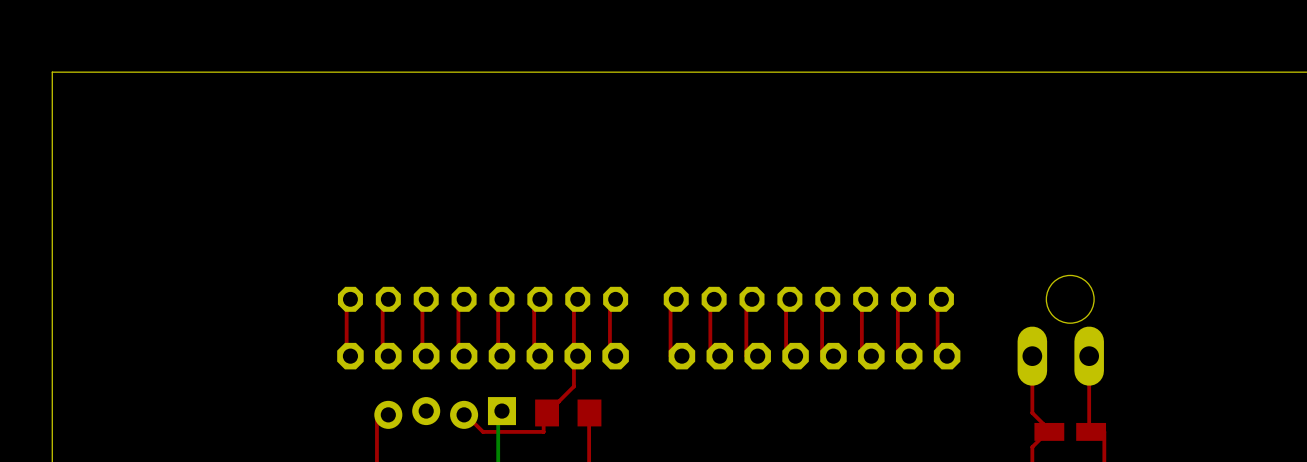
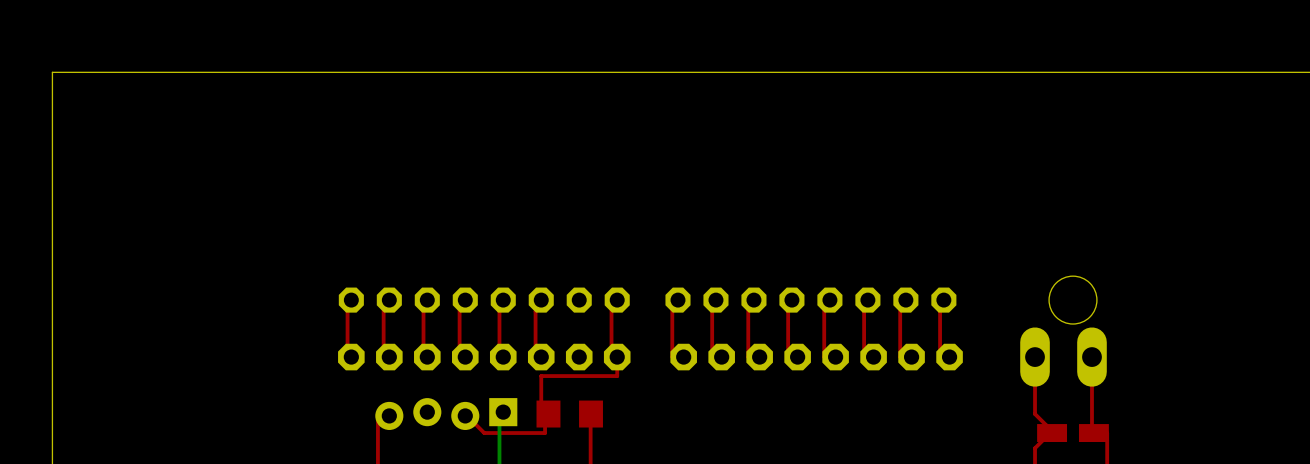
top track: (577, 299) (573, 310) (573, 386) (547, 412) -> (617, 357) (617, 376) (541, 376) (541, 414) (548, 414)

